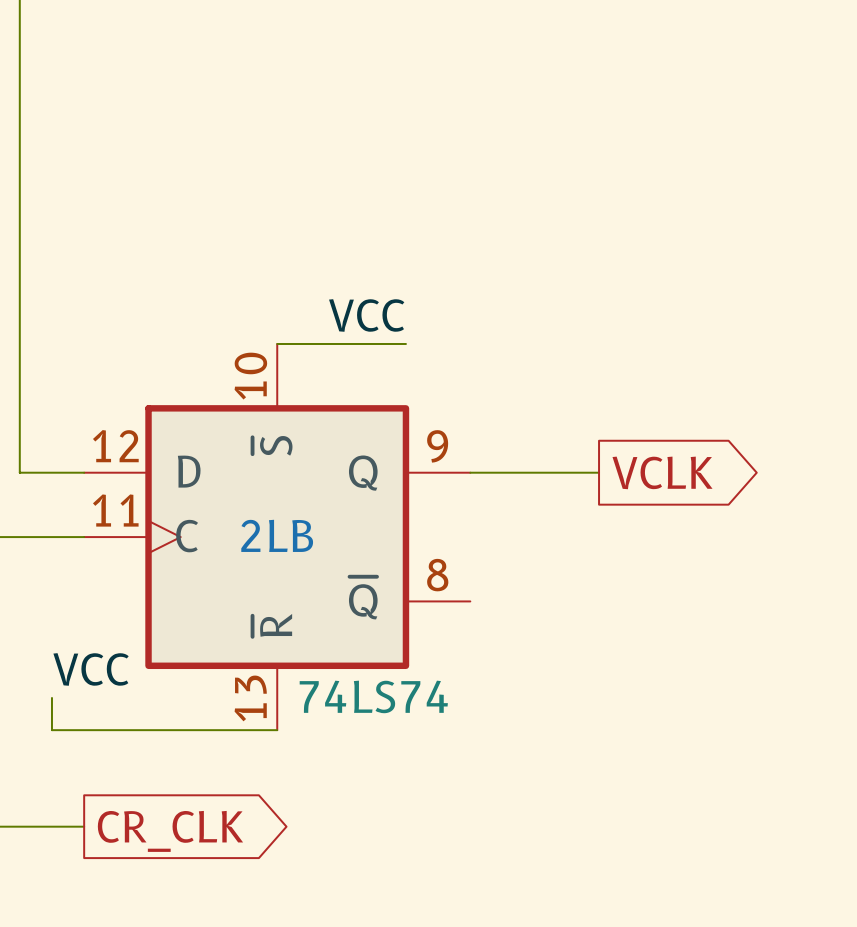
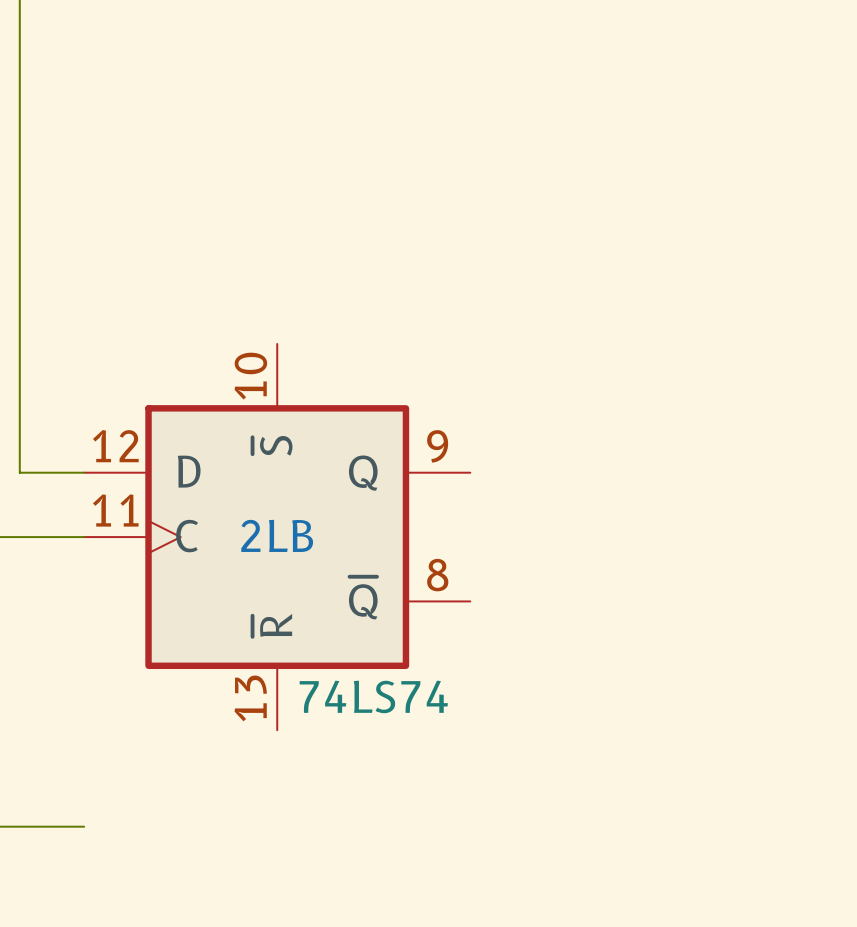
label: VCC (366, 315) -> none
wire: (277, 343) (405, 343) -> none
wire: (470, 472) (599, 472) -> none
global label: VCLK (662, 472) -> none
label: VCC (91, 669) -> none
wire: (51, 697) (51, 730) (277, 730) -> none
global label: CR_CLK (170, 831) -> none

